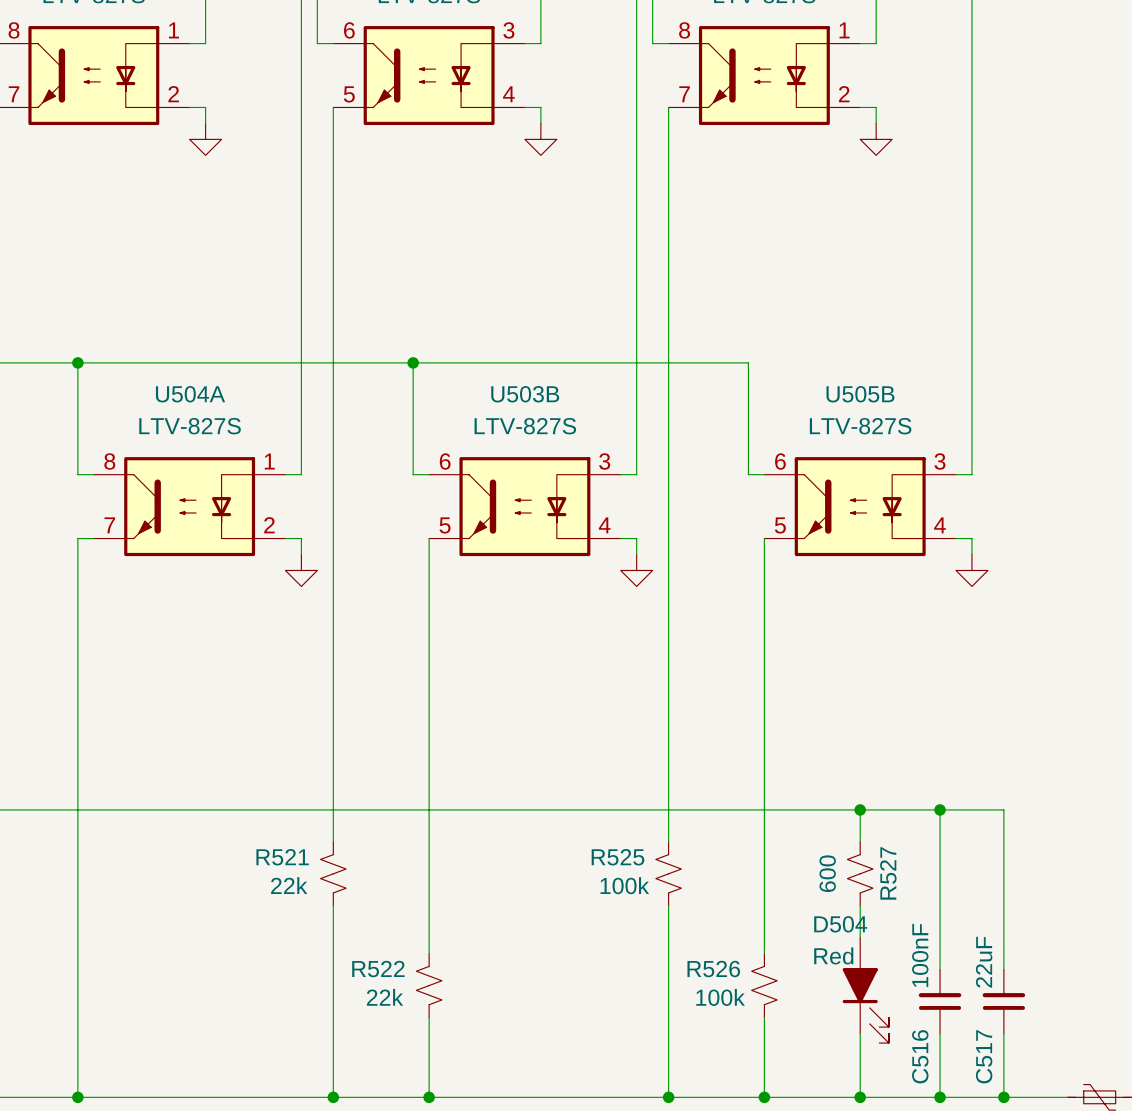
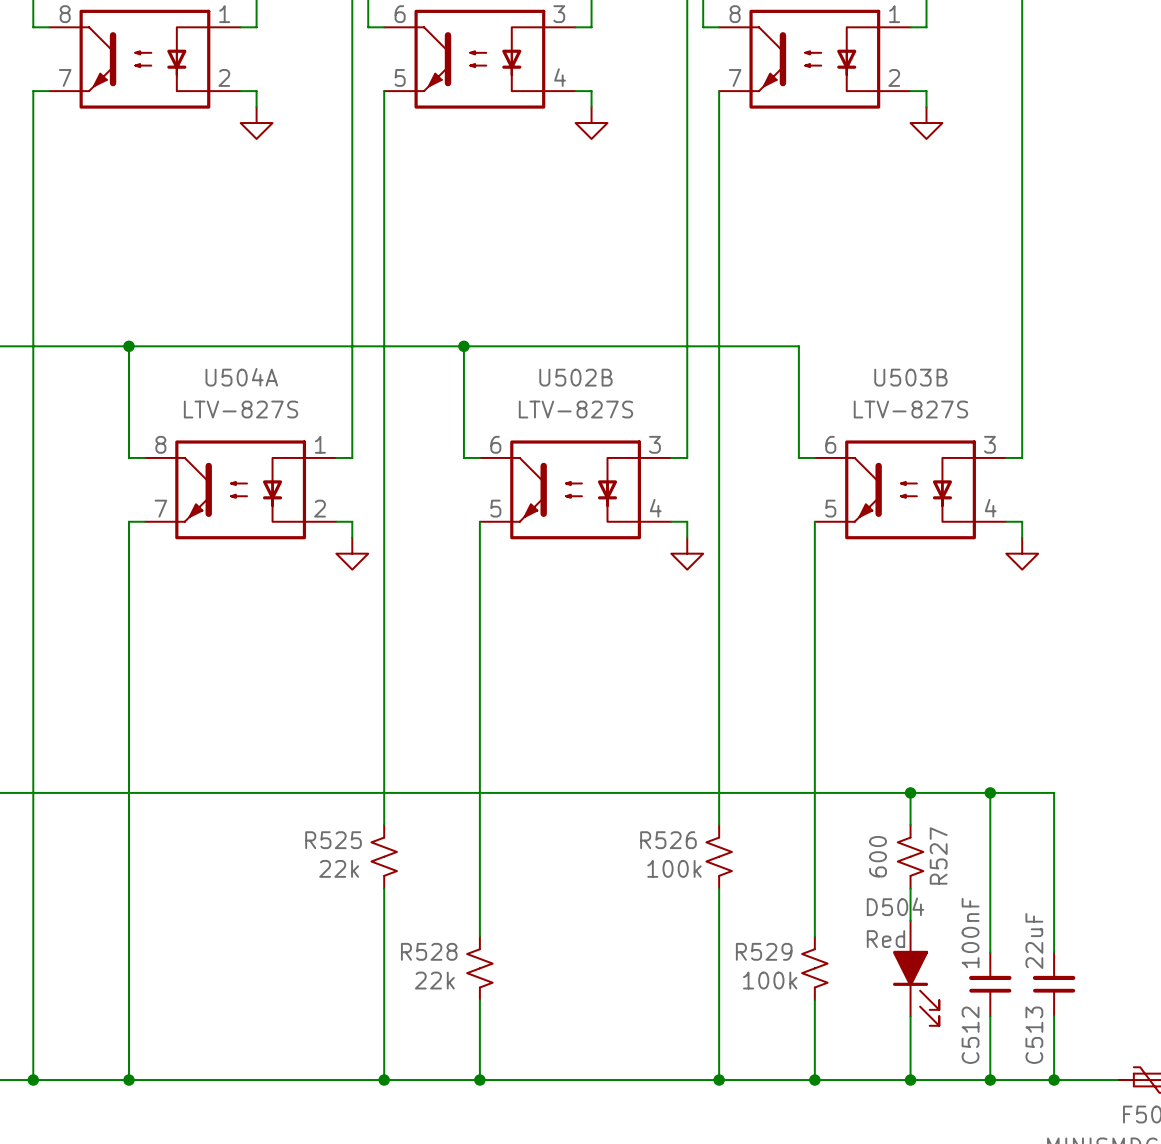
U503B name: U503B (525, 394) -> U502B (575, 377)
U505B name: U505B (860, 394) -> U503B (910, 377)
R521 name: R521 (282, 857) -> R525 (333, 840)
R525 name: R525 (617, 857) -> R526 (668, 840)
R522 name: R522 (378, 969) -> R528 (429, 951)
R526 name: R526 (713, 969) -> R529 (764, 951)
C516 name: C516 (920, 1056) -> C512 (970, 1035)
C517 name: C517 (984, 1056) -> C513 (1034, 1035)

